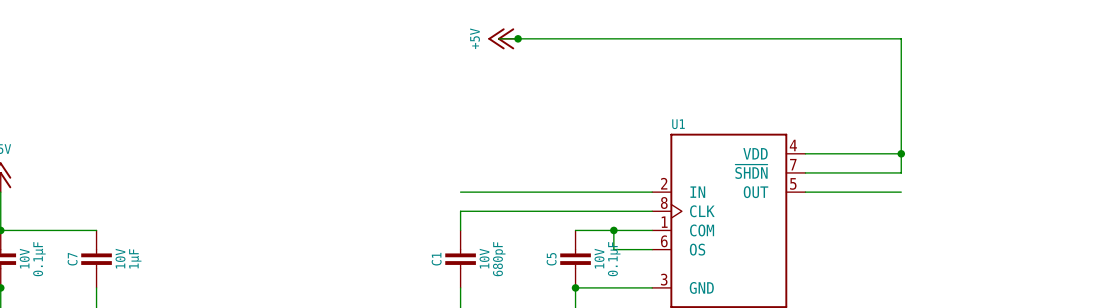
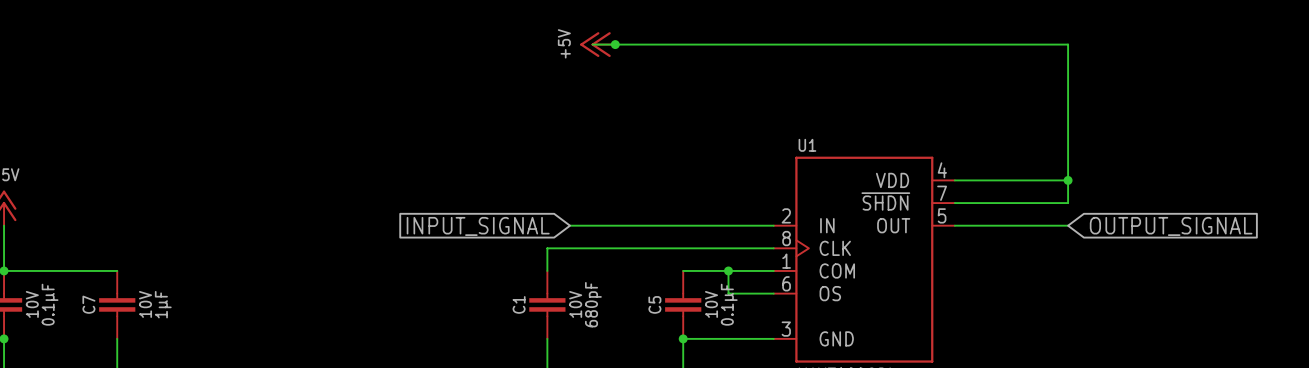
wire: (460, 192) (479, 192) -> none
global label: none -> INPUT_SIGNAL (478, 226)
global label: none -> OUTPUT_SIGNAL (1171, 226)

